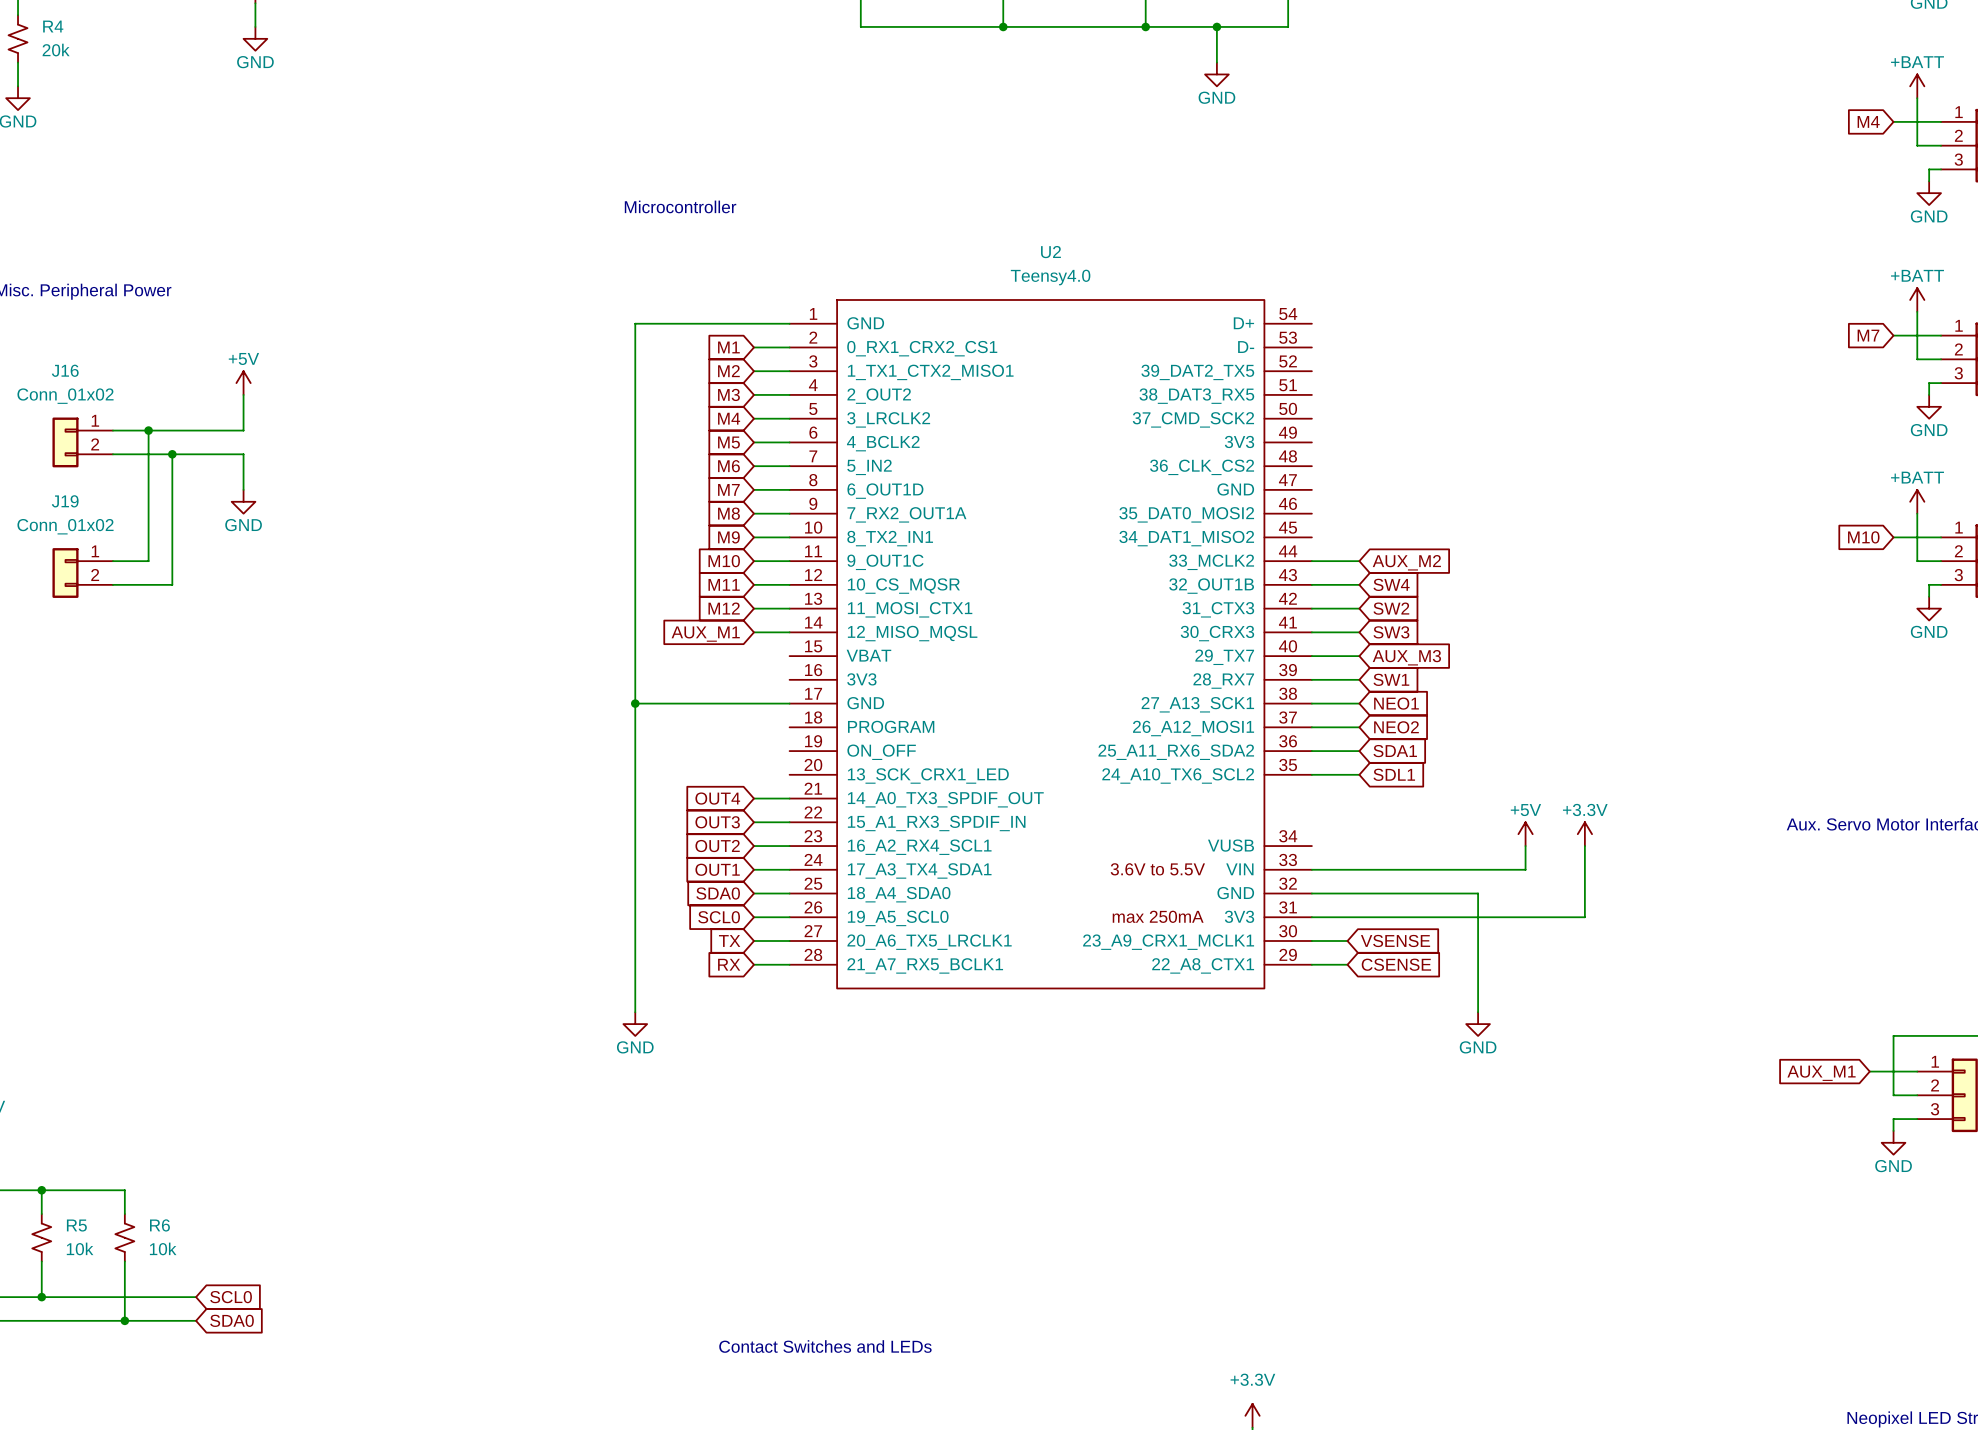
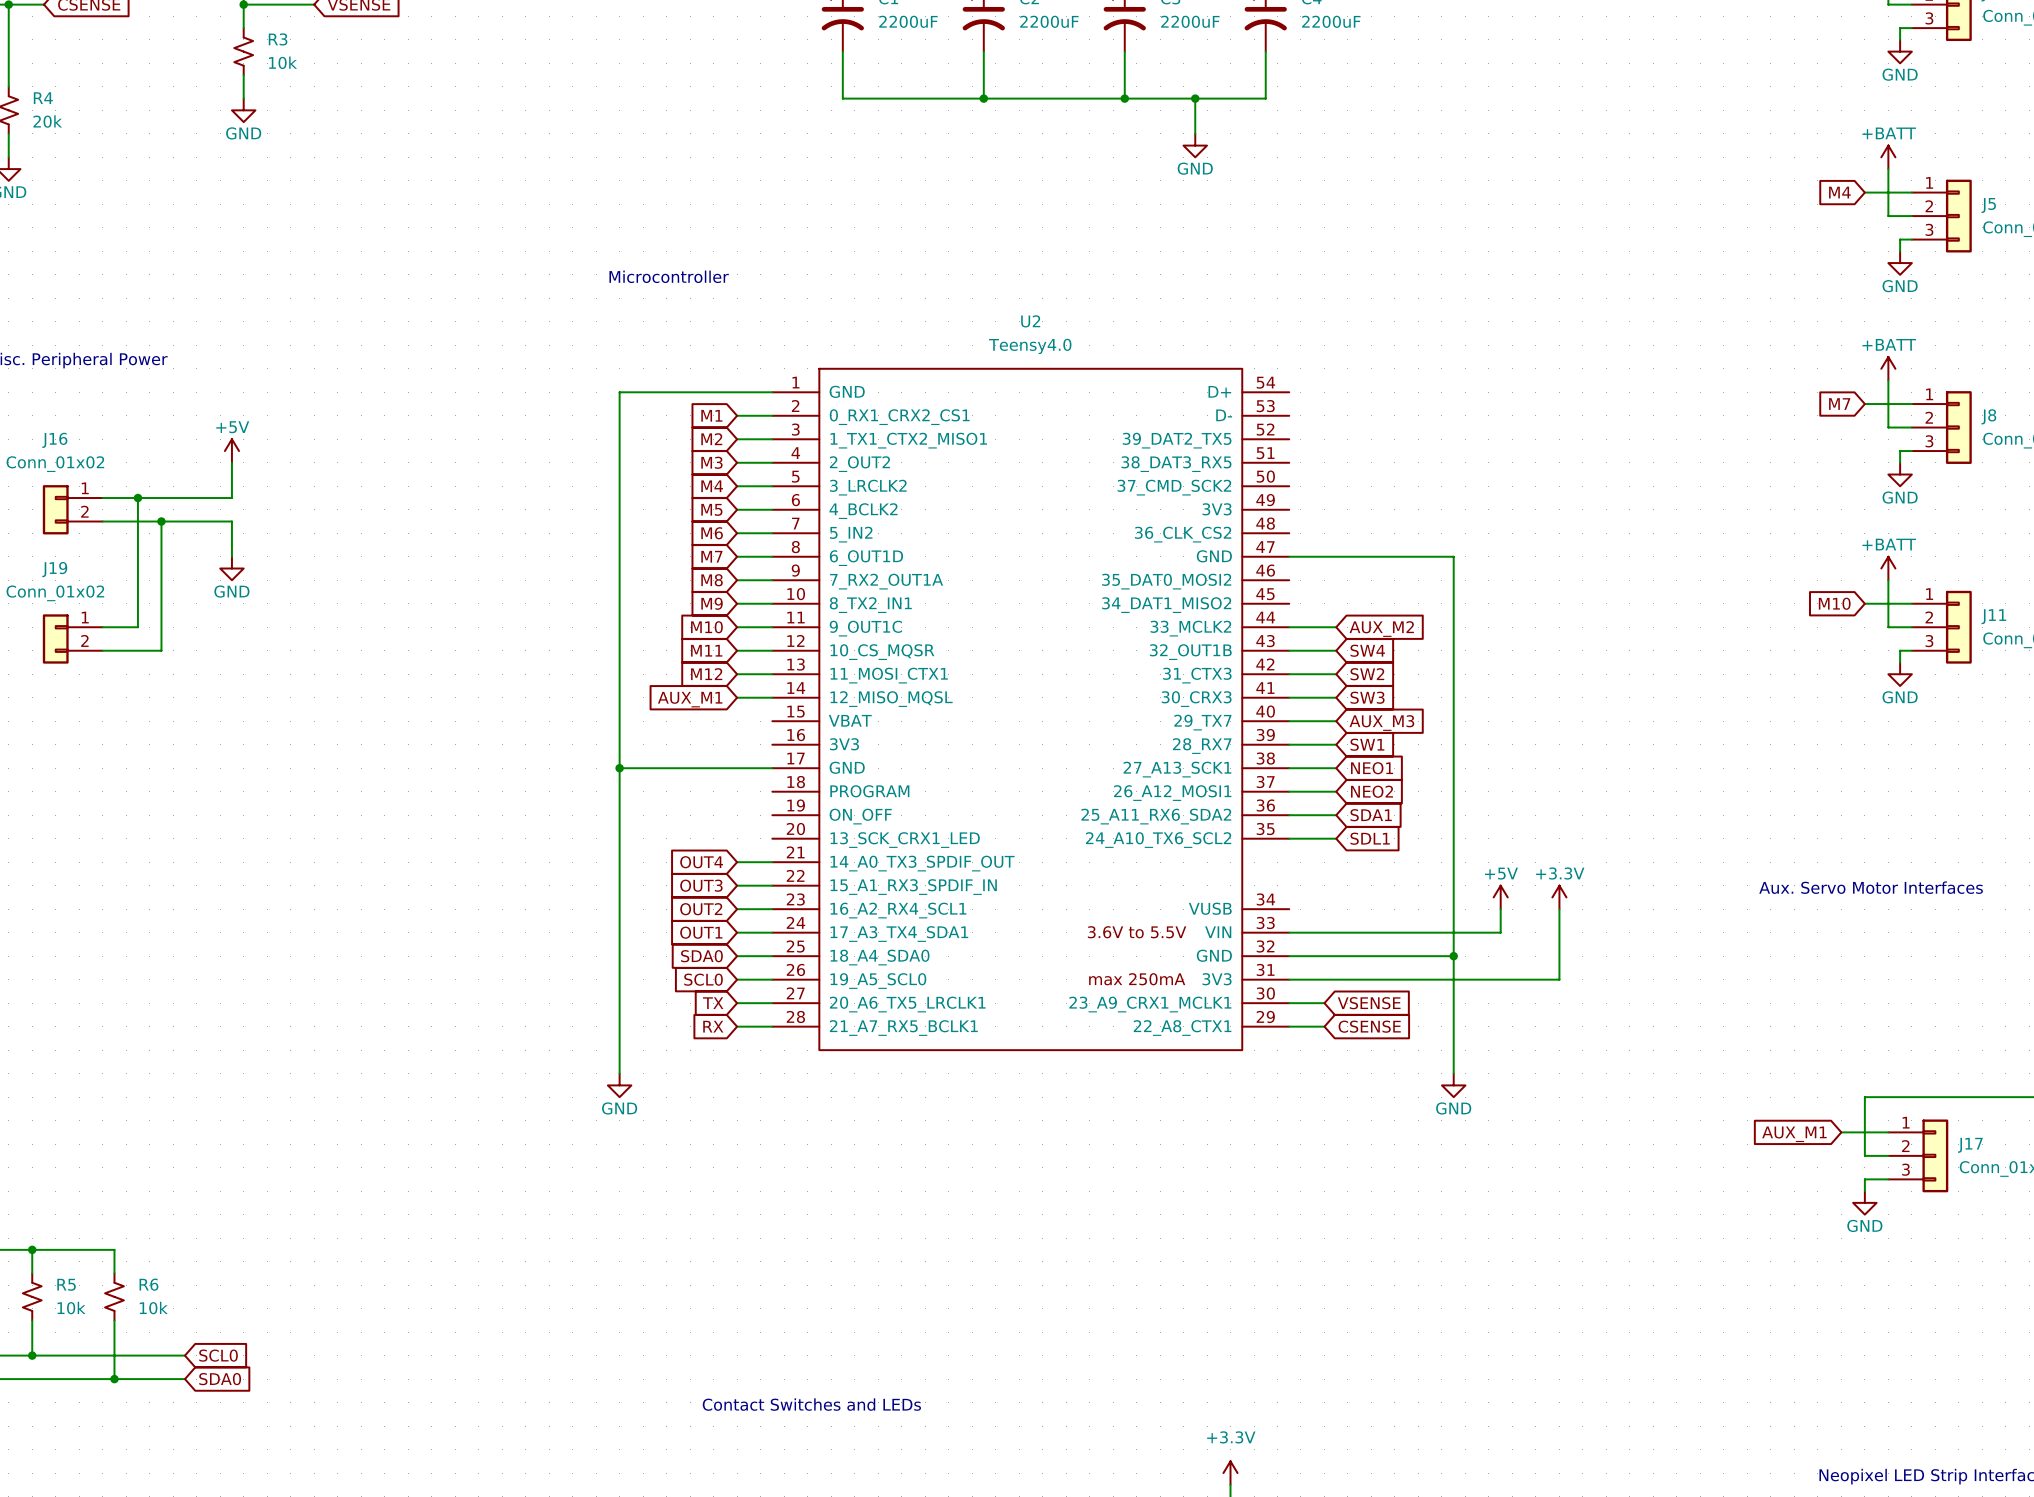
wire: none -> (1289, 556) (1453, 556) (1453, 956)
junction: none -> (1453, 956)

